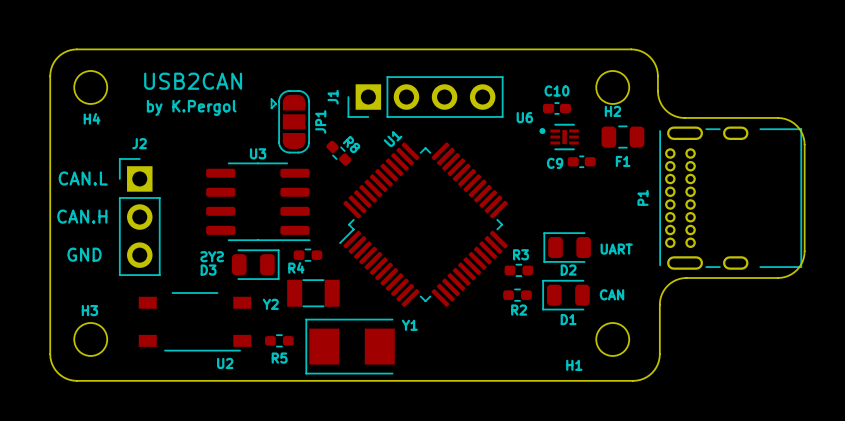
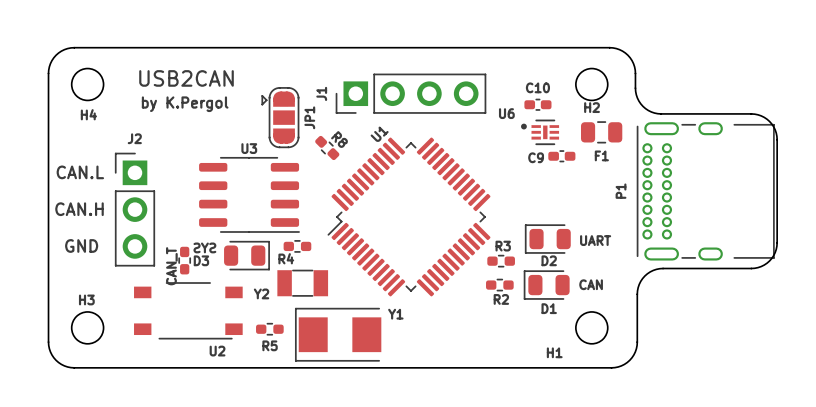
CAN_T: none -> (184, 260)

